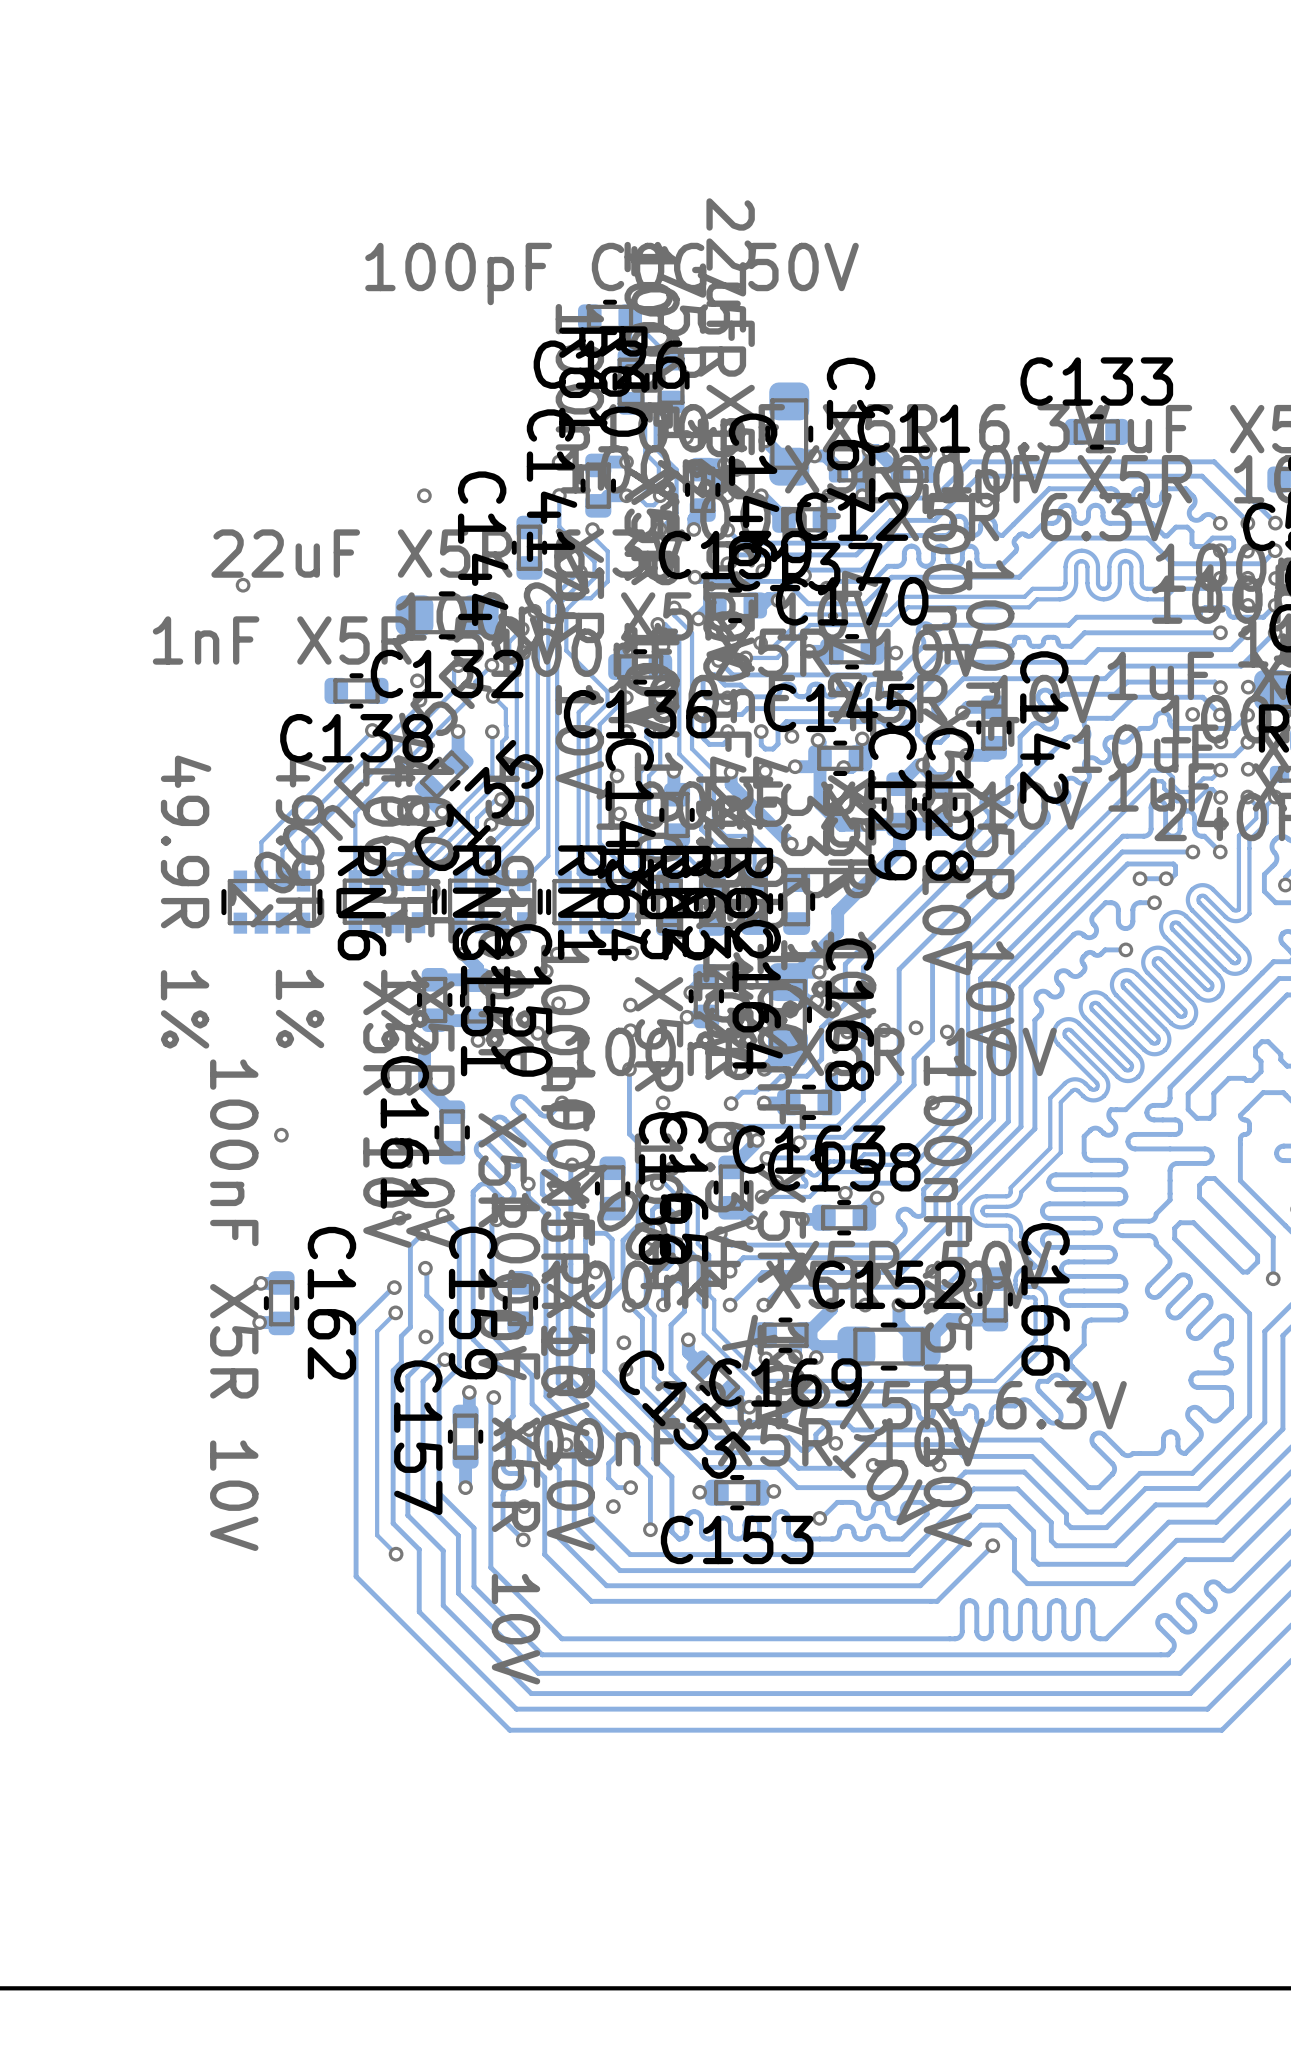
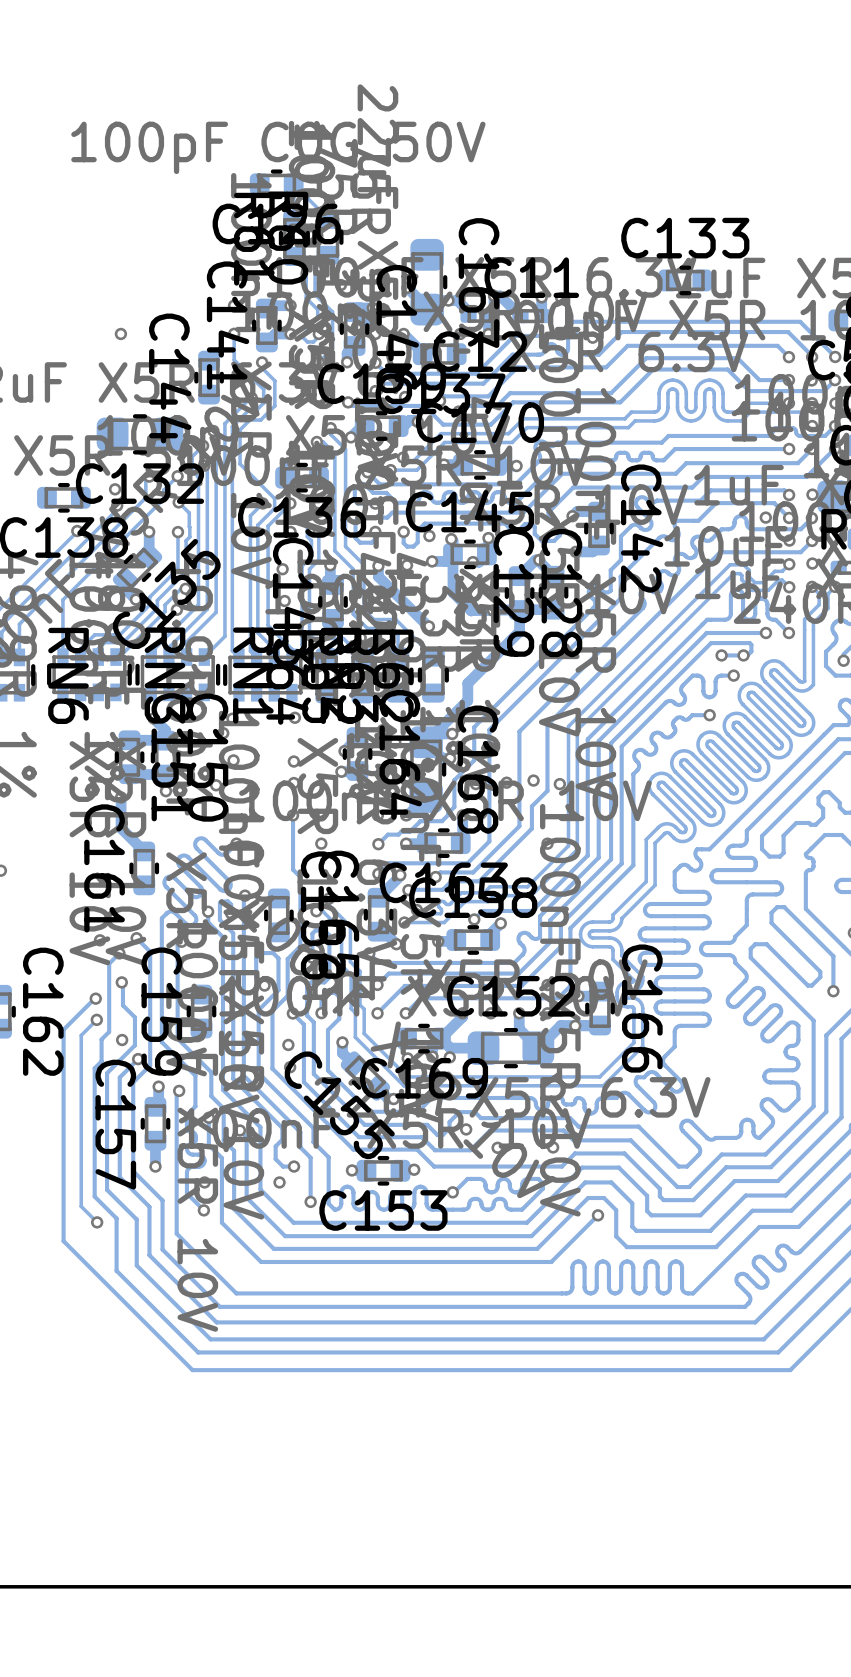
track: (1233, 481) (1214, 461) (970, 461) (934, 498) -> (800, 321) (571, 321) (557, 335) (548, 335)
track: (1219, 493) (1202, 476) (978, 476) (934, 520) (923, 520) -> (788, 332) (621, 332) (599, 354) (582, 353) (580, 349) (579, 337) (573, 333) (568, 337) (567, 350) (565, 353) (559, 353) (555, 345) (549, 344) (546, 345) (543, 352) (539, 354)
track: (1028, 509) (1049, 488) (1112, 489) (1117, 492) (1119, 502) (1125, 505) (1131, 502) (1133, 492) (1138, 489) (1145, 490) (1148, 502) (1154, 505) (1160, 502) (1162, 493) (1165, 489) (1185, 488) (1194, 499) (1189, 512) (1191, 518) (1198, 520) (1207, 514) (1213, 516) -> (627, 345) (777, 345) (783, 351)
track: (1002, 535) (996, 532) (994, 521) (987, 518) (981, 521) (978, 533) (970, 534) (966, 531) (965, 519) (958, 516) (952, 519) (950, 532) (944, 535) -> (606, 367) (557, 367)
track: (1220, 550) (1230, 550) (1233, 547) (1233, 540) (1231, 538) (1212, 538) (1204, 546) (1194, 546) (1191, 543) (1191, 531) (1187, 527) (1175, 527) (1167, 535) (1164, 535) (1151, 523) (1108, 523) (1103, 518) (1102, 508) (1096, 505) (1089, 508) (1086, 521) (1079, 523) (1074, 518) (1072, 508) (1065, 505) (1060, 508) (1058, 518) (1055, 522) (1043, 523) (1030, 536) (1022, 533) (1019, 535) (1014, 541) (1015, 550) (1000, 566) -> (788, 380) (759, 380) (737, 358) (646, 358) (611, 393) (604, 393)
track: (984, 566) (978, 563) (975, 549) (969, 546) (963, 549) (961, 561) (957, 566) (949, 563) (946, 549) (940, 546) (934, 549) (931, 564) (923, 565) (919, 561) (917, 549) (911, 546) (905, 549) (902, 563) (897, 566) -> (590, 393) (517, 393)

